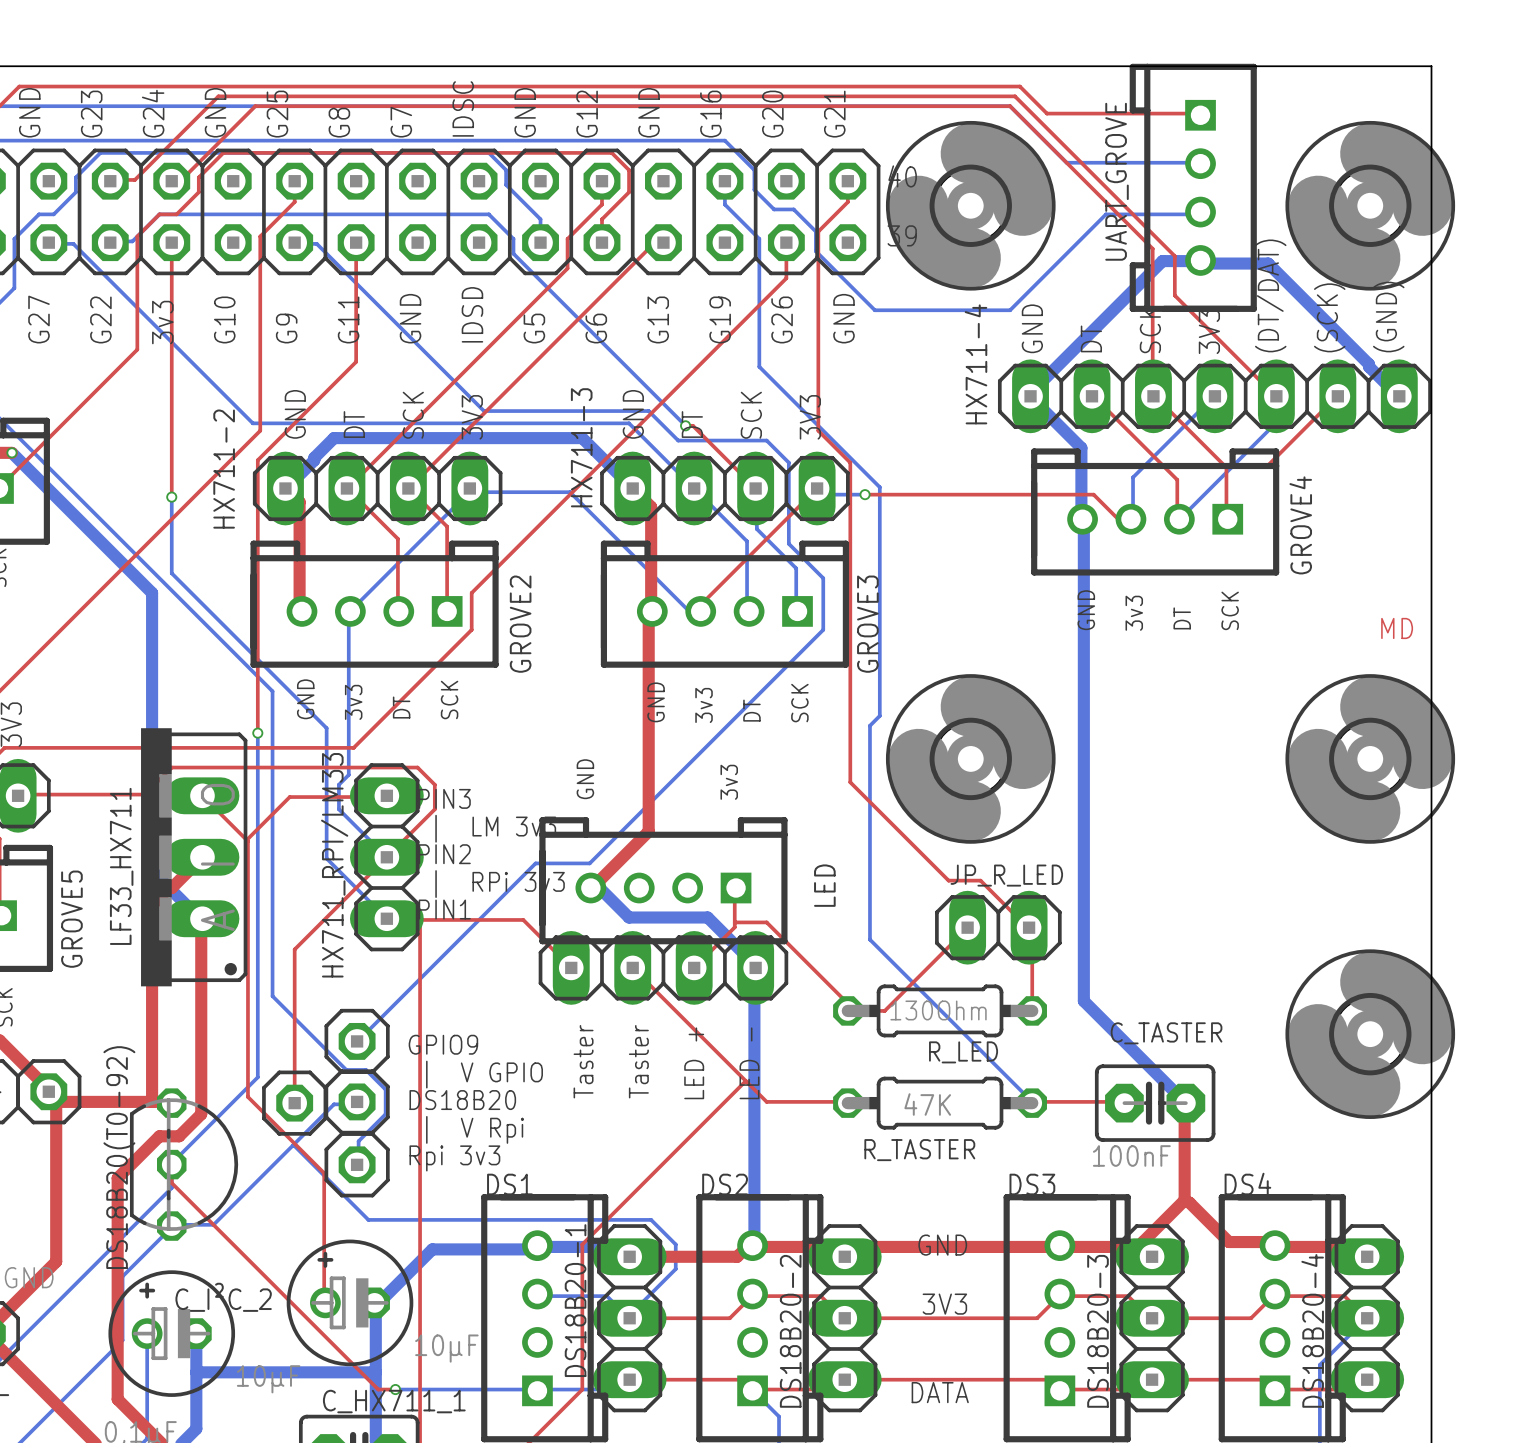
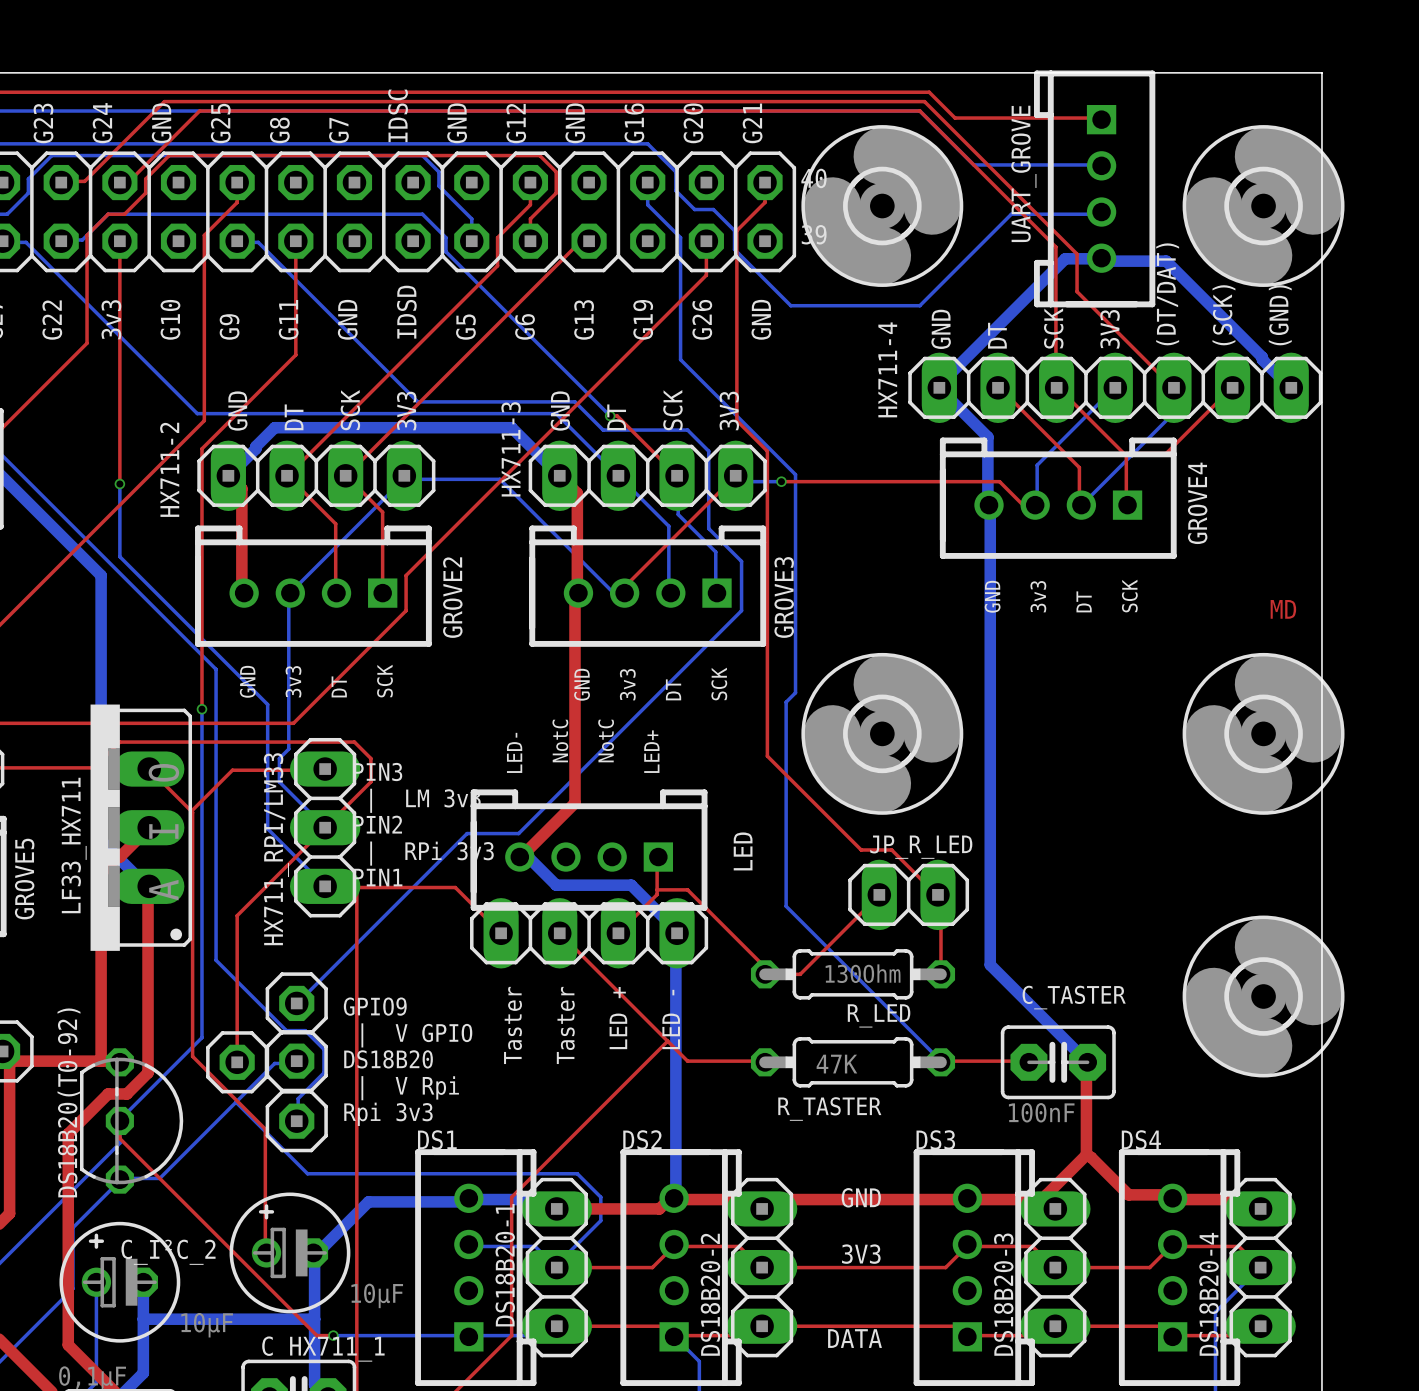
text: none -> NotC (560, 741)
text: none -> NotC (606, 741)
text: GND (585, 779) -> LED- (514, 752)
text: 3v3 (729, 782) -> LED+ (651, 751)

